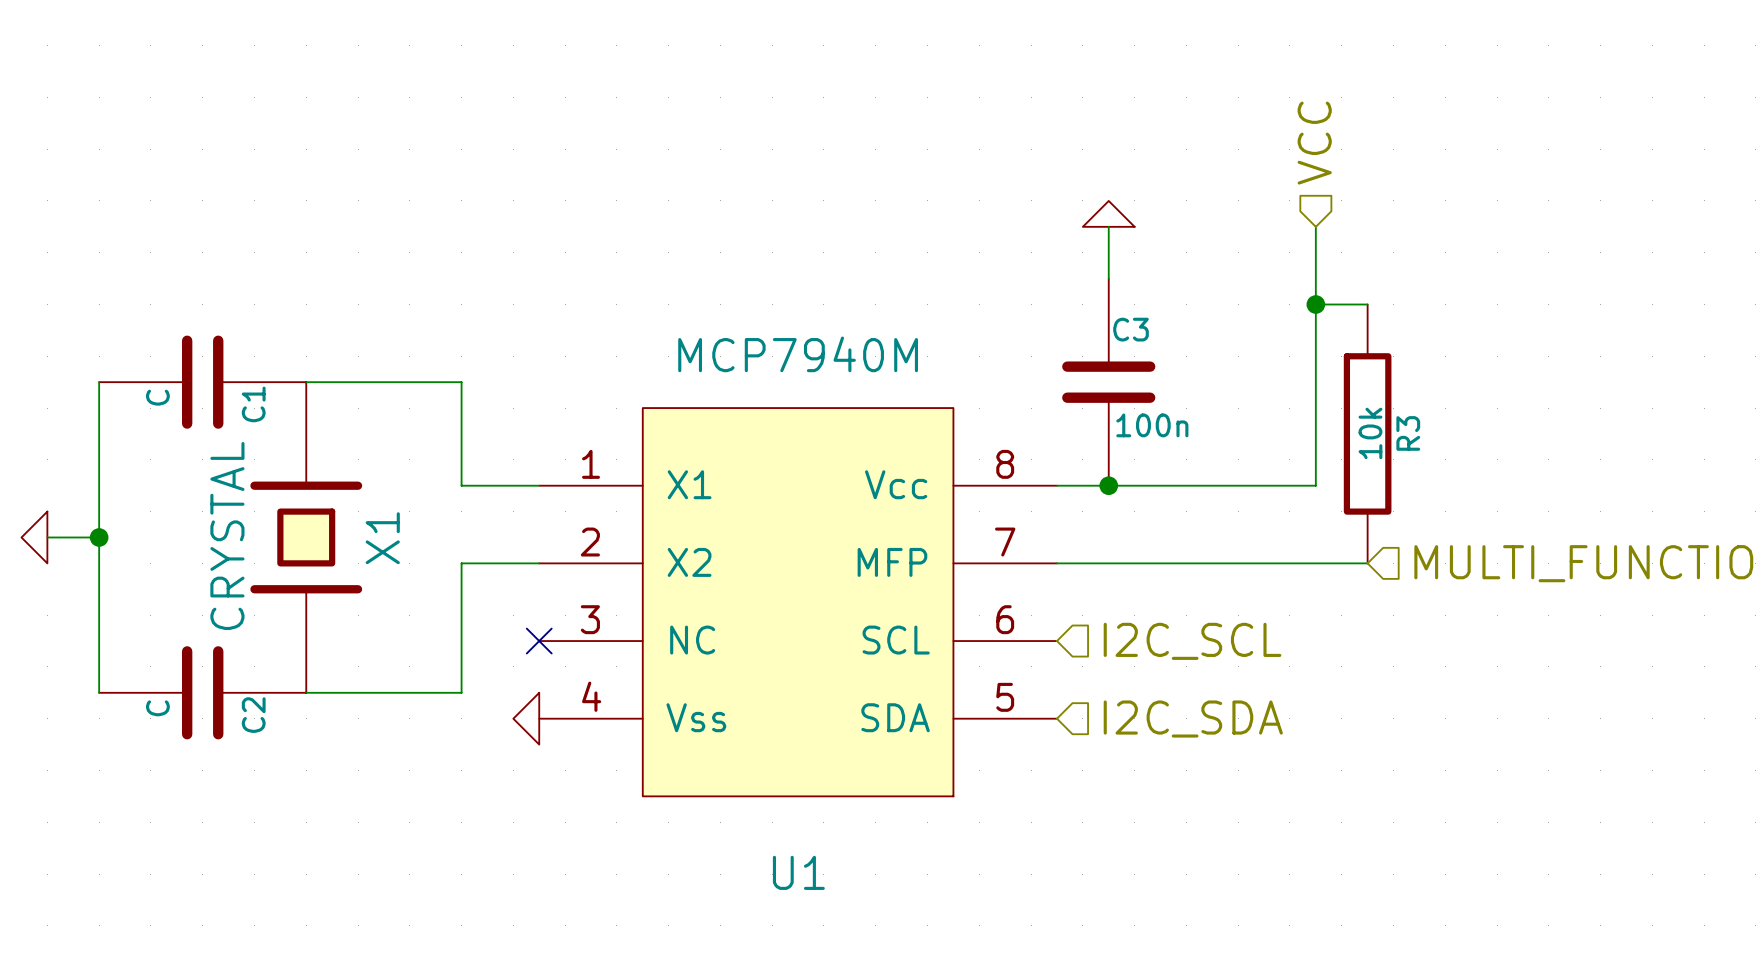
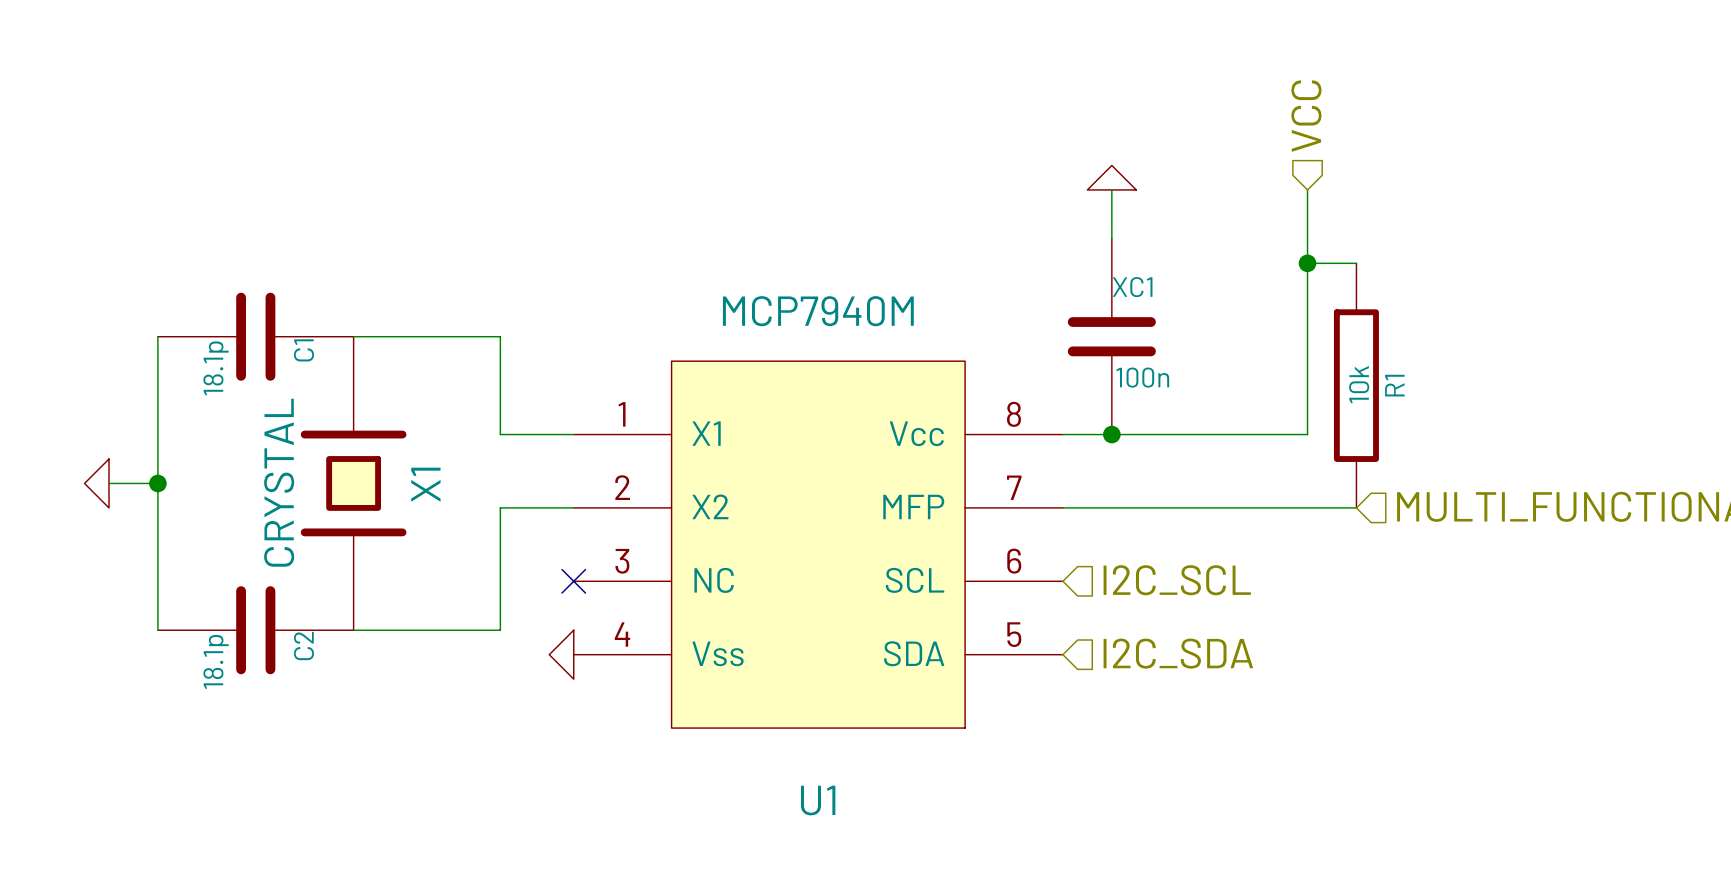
C3 name: C3 (1131, 329) -> XC1 (1132, 287)
C1 value: C (157, 397) -> 18.1p (216, 368)
R3 name: R3 (1408, 433) -> R1 (1394, 385)
C2 value: C (157, 708) -> 18.1p (216, 661)

